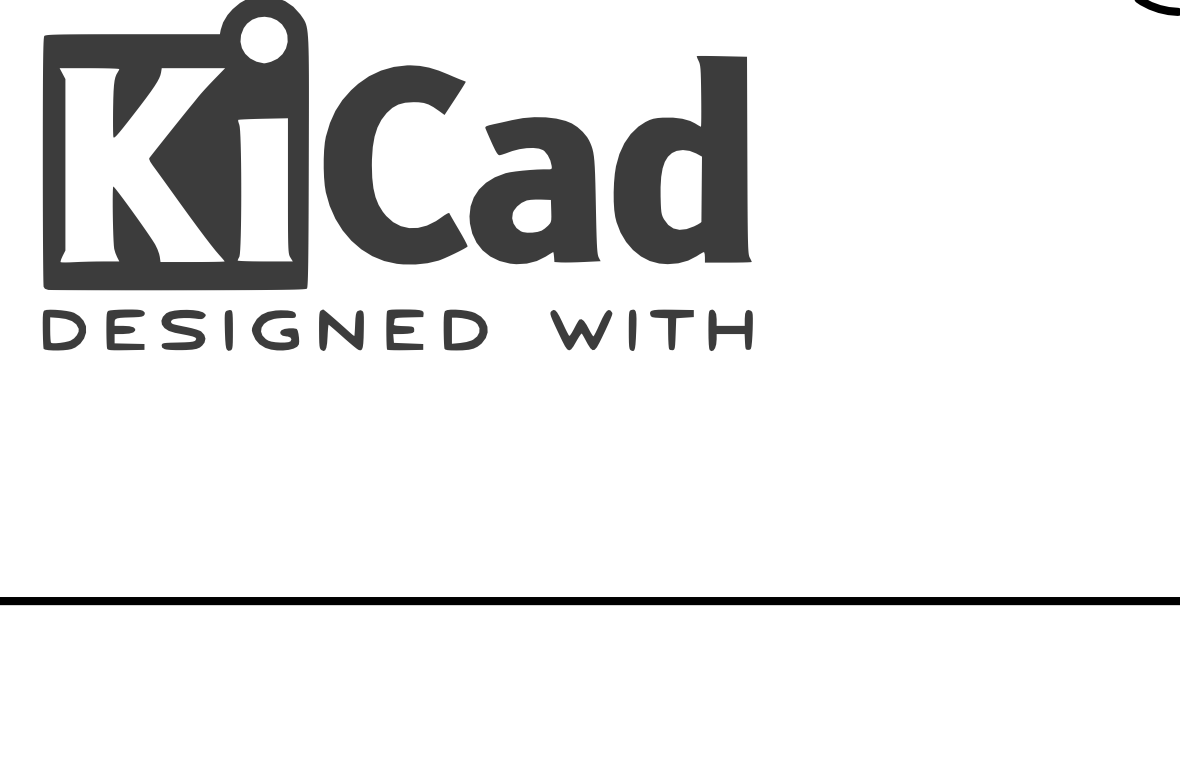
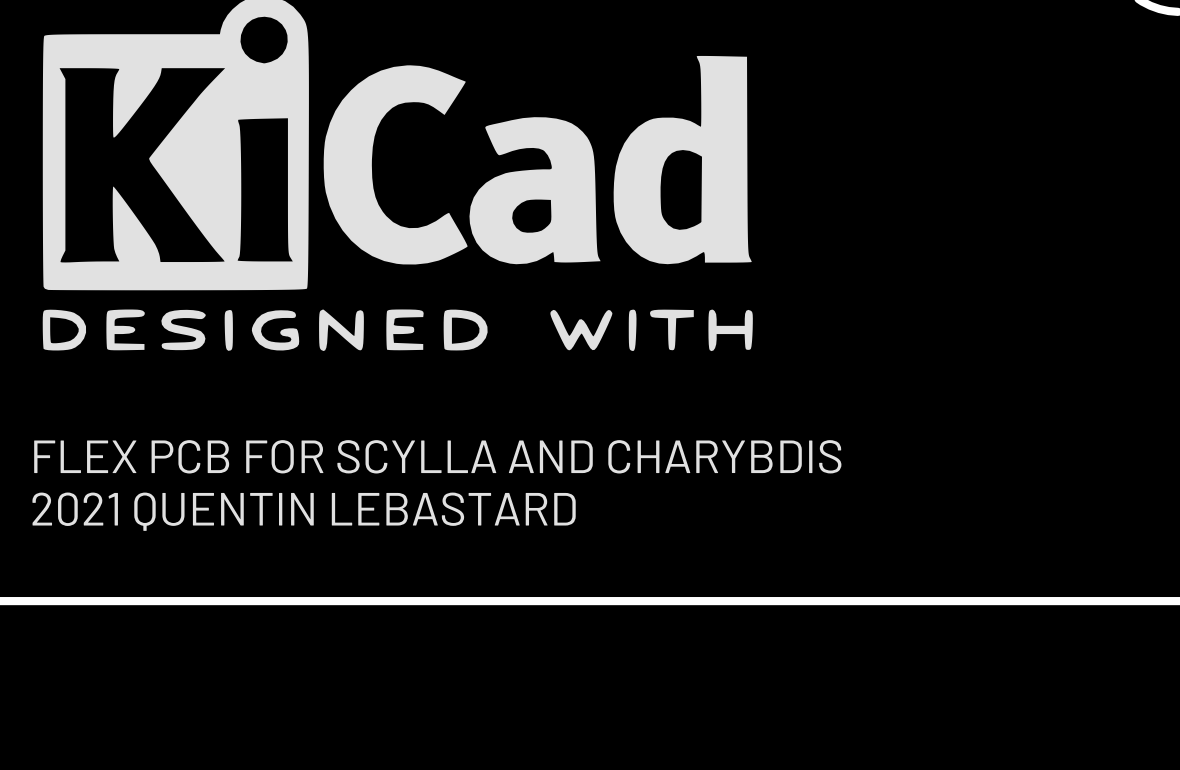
text: none -> FLEX PCB FOR SCYLLA AND CHARYBDIS (437, 456)
text: none -> 2021 QUENTIN LEBASTARD (304, 511)

